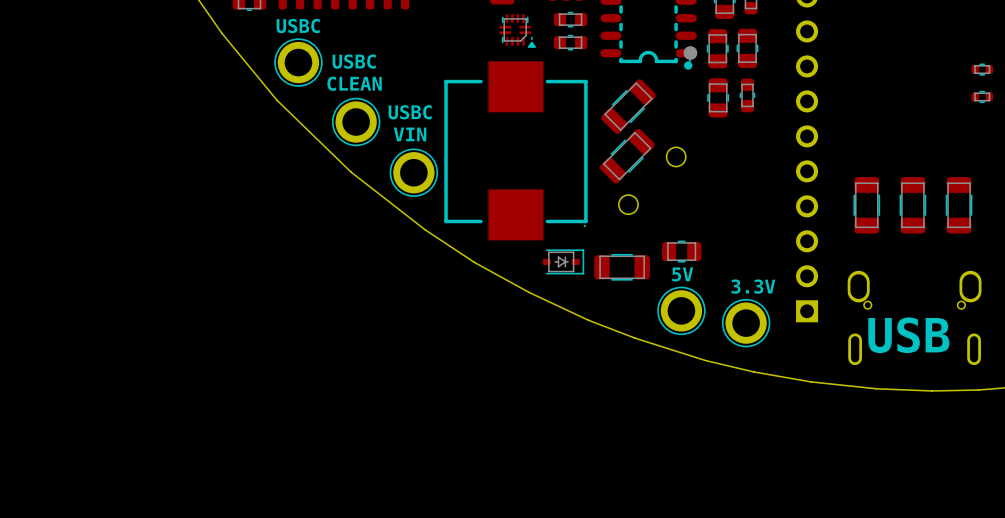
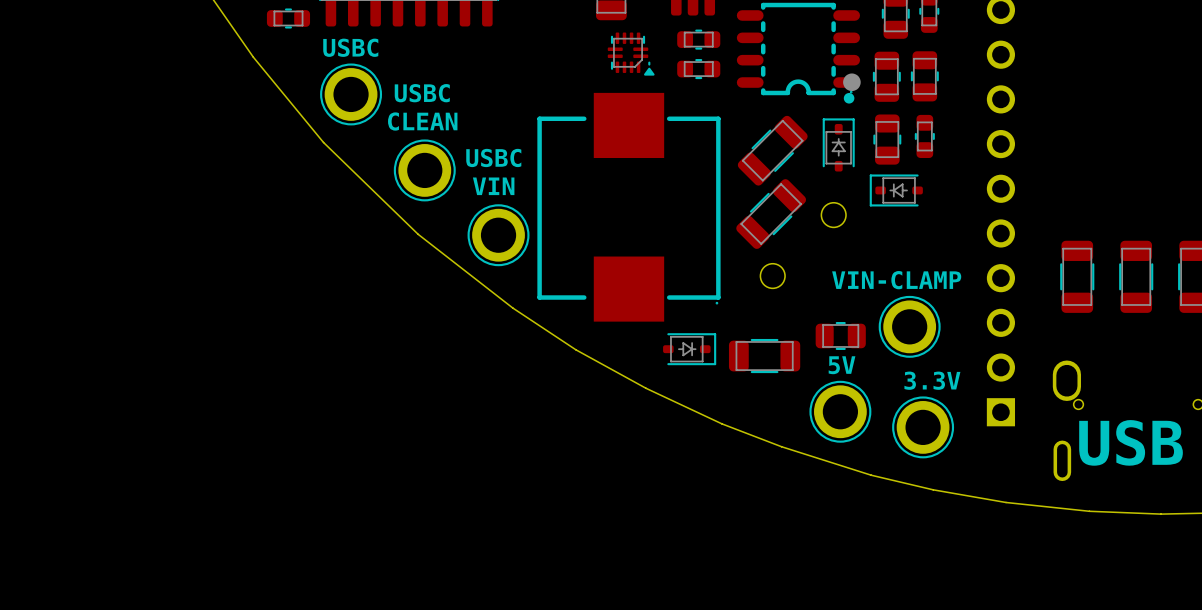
part: none -> (838, 144)
part: none -> (896, 190)
text: none -> VIN-CLAMP (896, 280)
part: none -> (909, 326)

